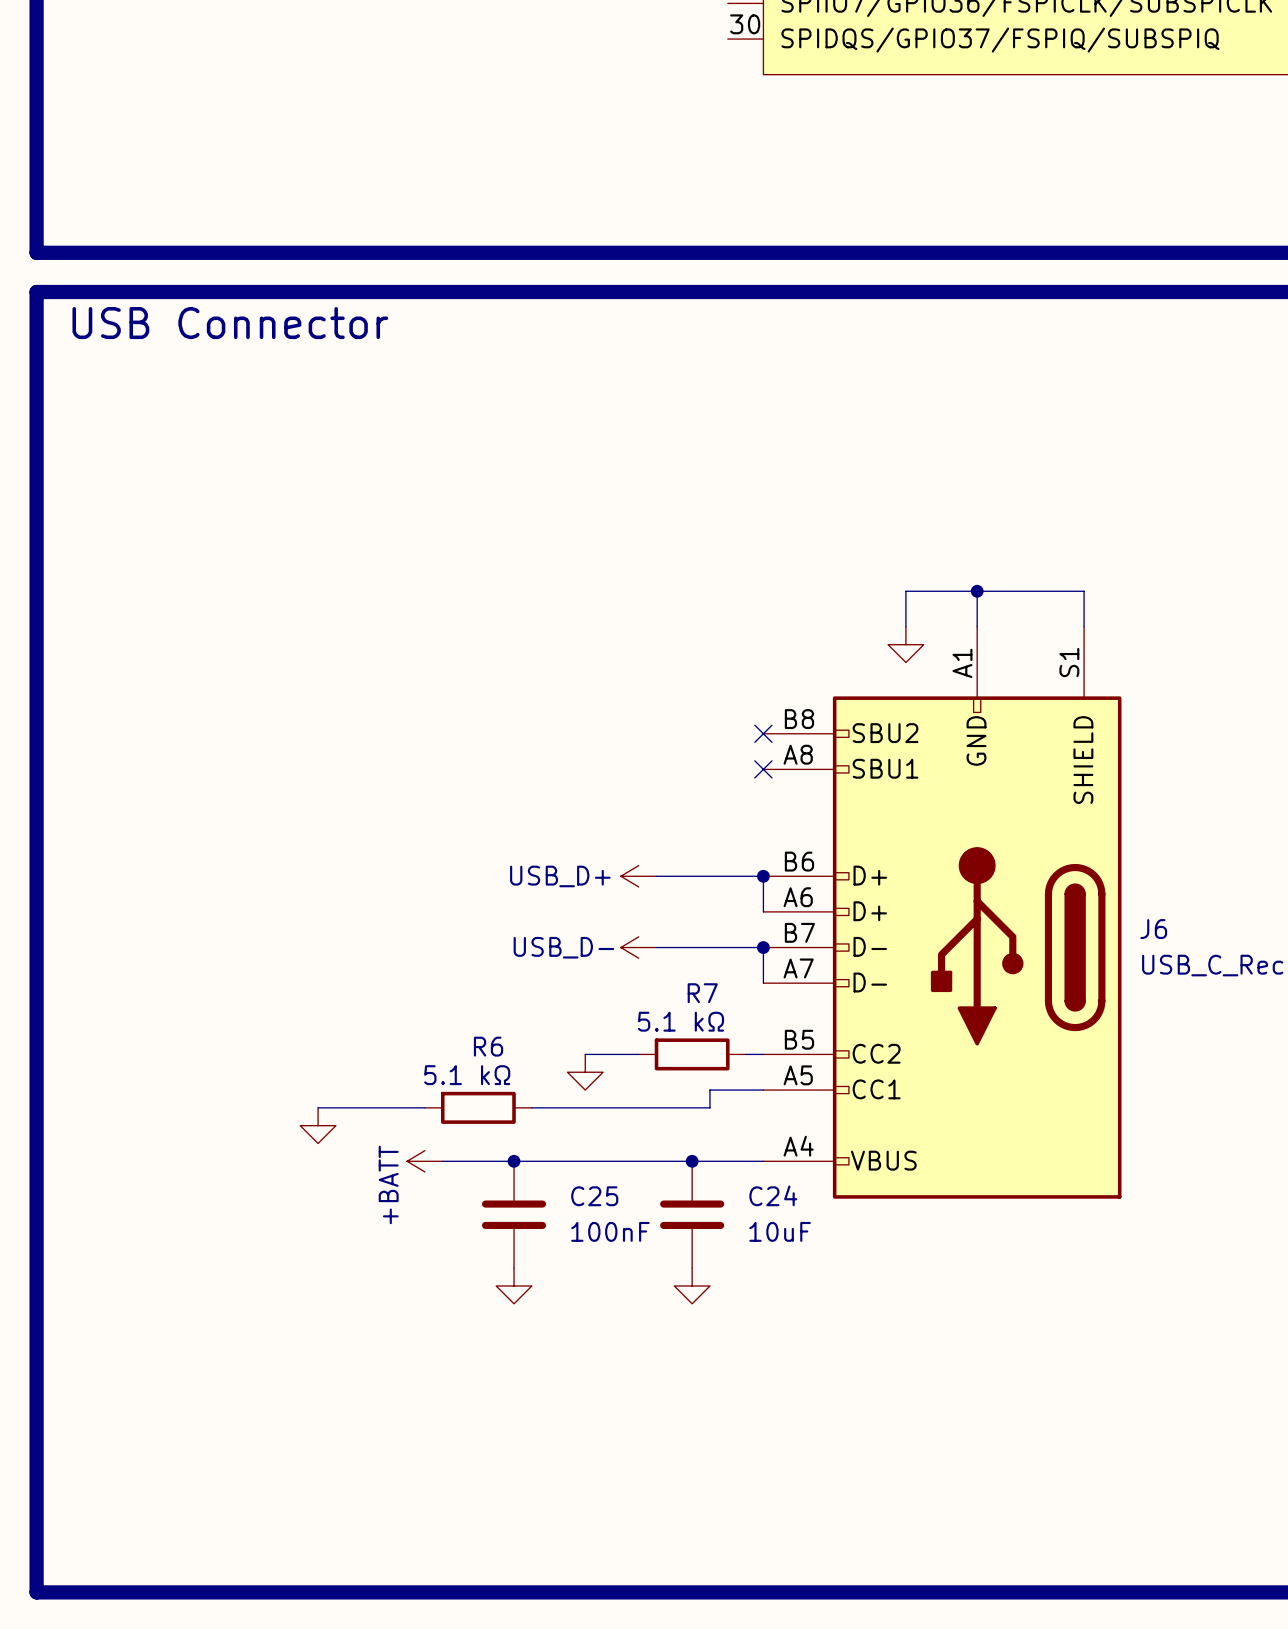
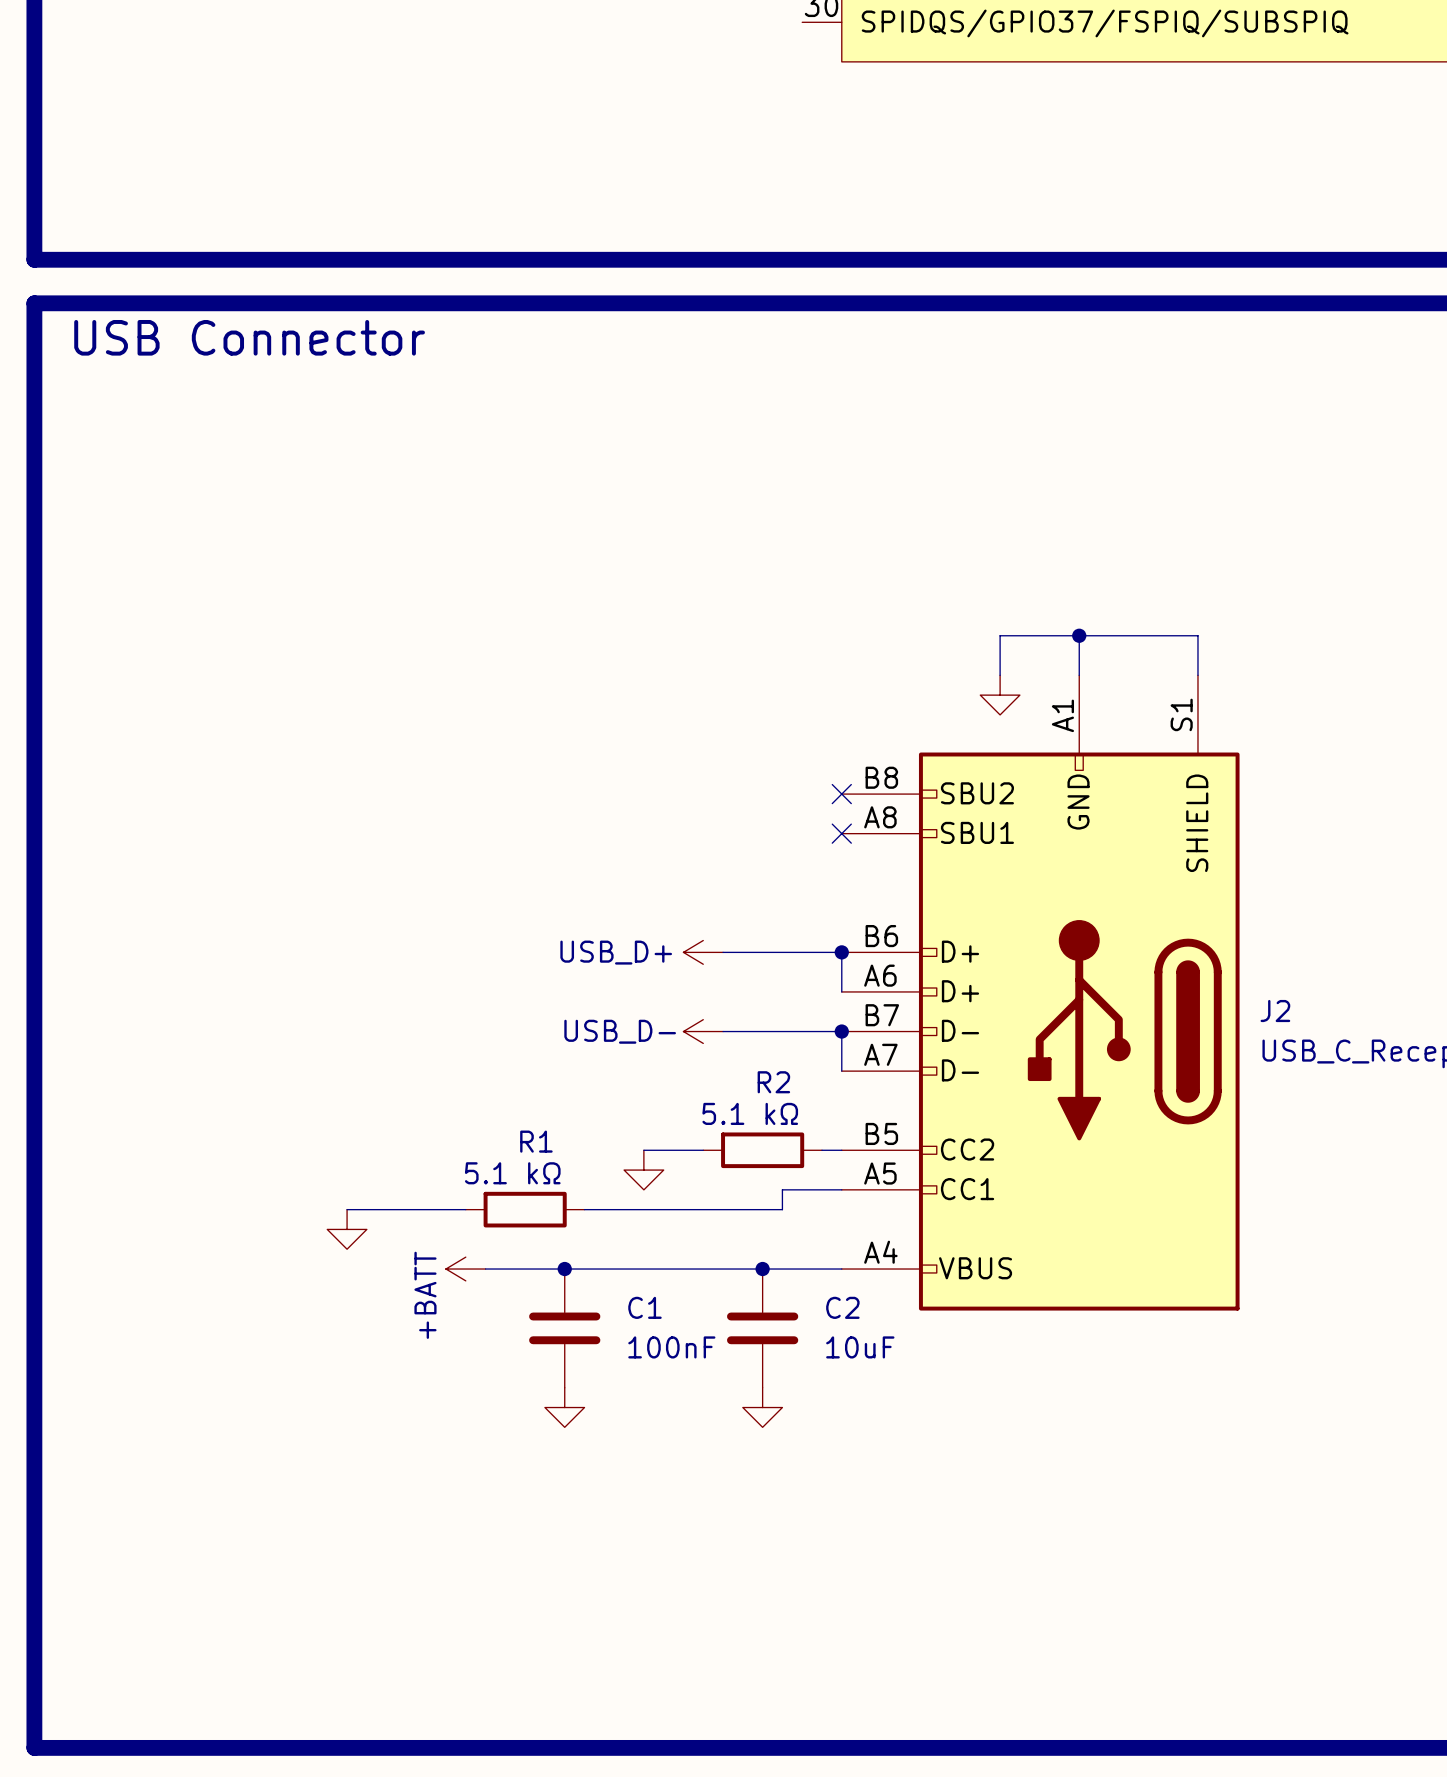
J6 name: J6 (1153, 929) -> J2 (1275, 1011)
R7 name: R7 (702, 993) -> R2 (773, 1082)
R6 name: R6 (488, 1046) -> R1 (536, 1141)
C24 name: C24 (773, 1195) -> C2 (842, 1307)
C25 name: C25 (594, 1196) -> C1 (644, 1307)

